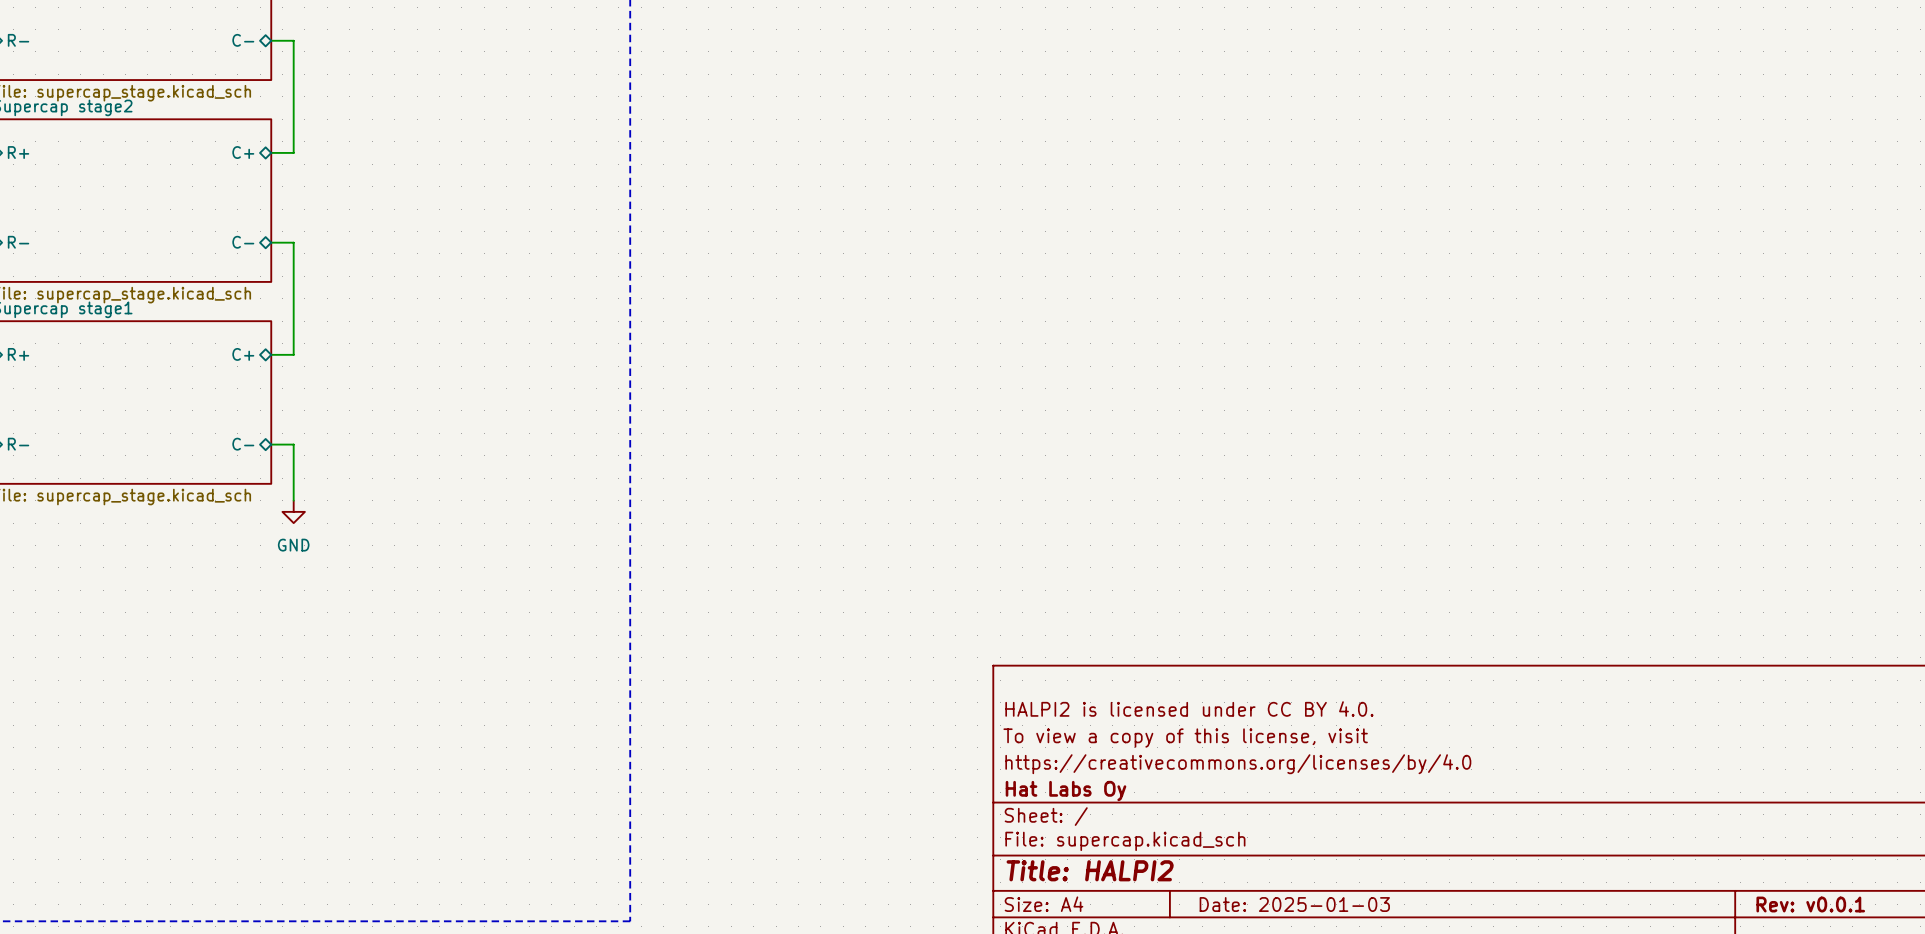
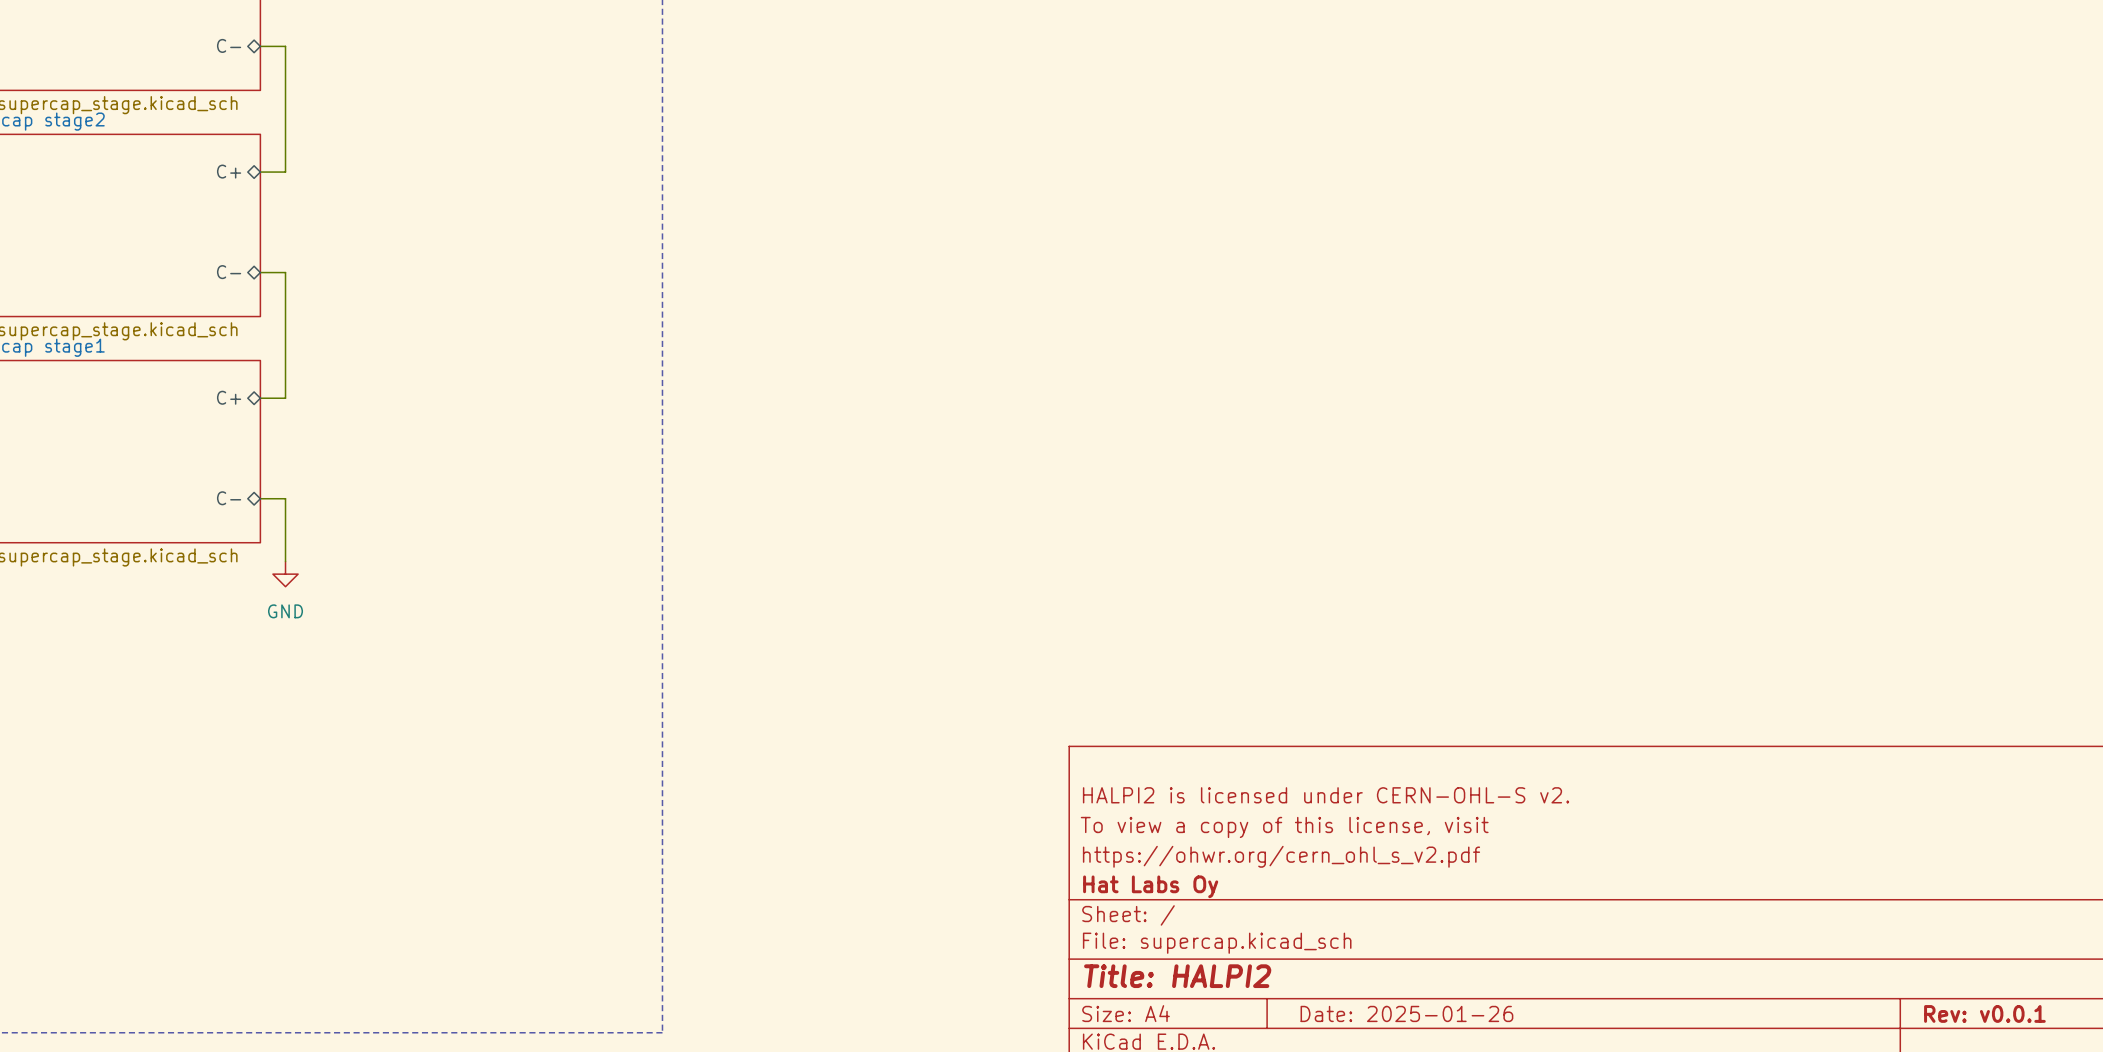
title block: HALPI2 is licensed under CC BY 4.0. (1189, 709) -> HALPI2 is licensed under CERN-OHL-S v2. (1326, 795)
title block: https://creativecommons.org/licenses/by/4.0 (1238, 764) -> https://ohwr.org/cern_ohl_s_v2.pdf (1281, 856)
title block: Date: 2025-01-03 (1294, 904) -> Date: 2025-01-26 (1406, 1013)

